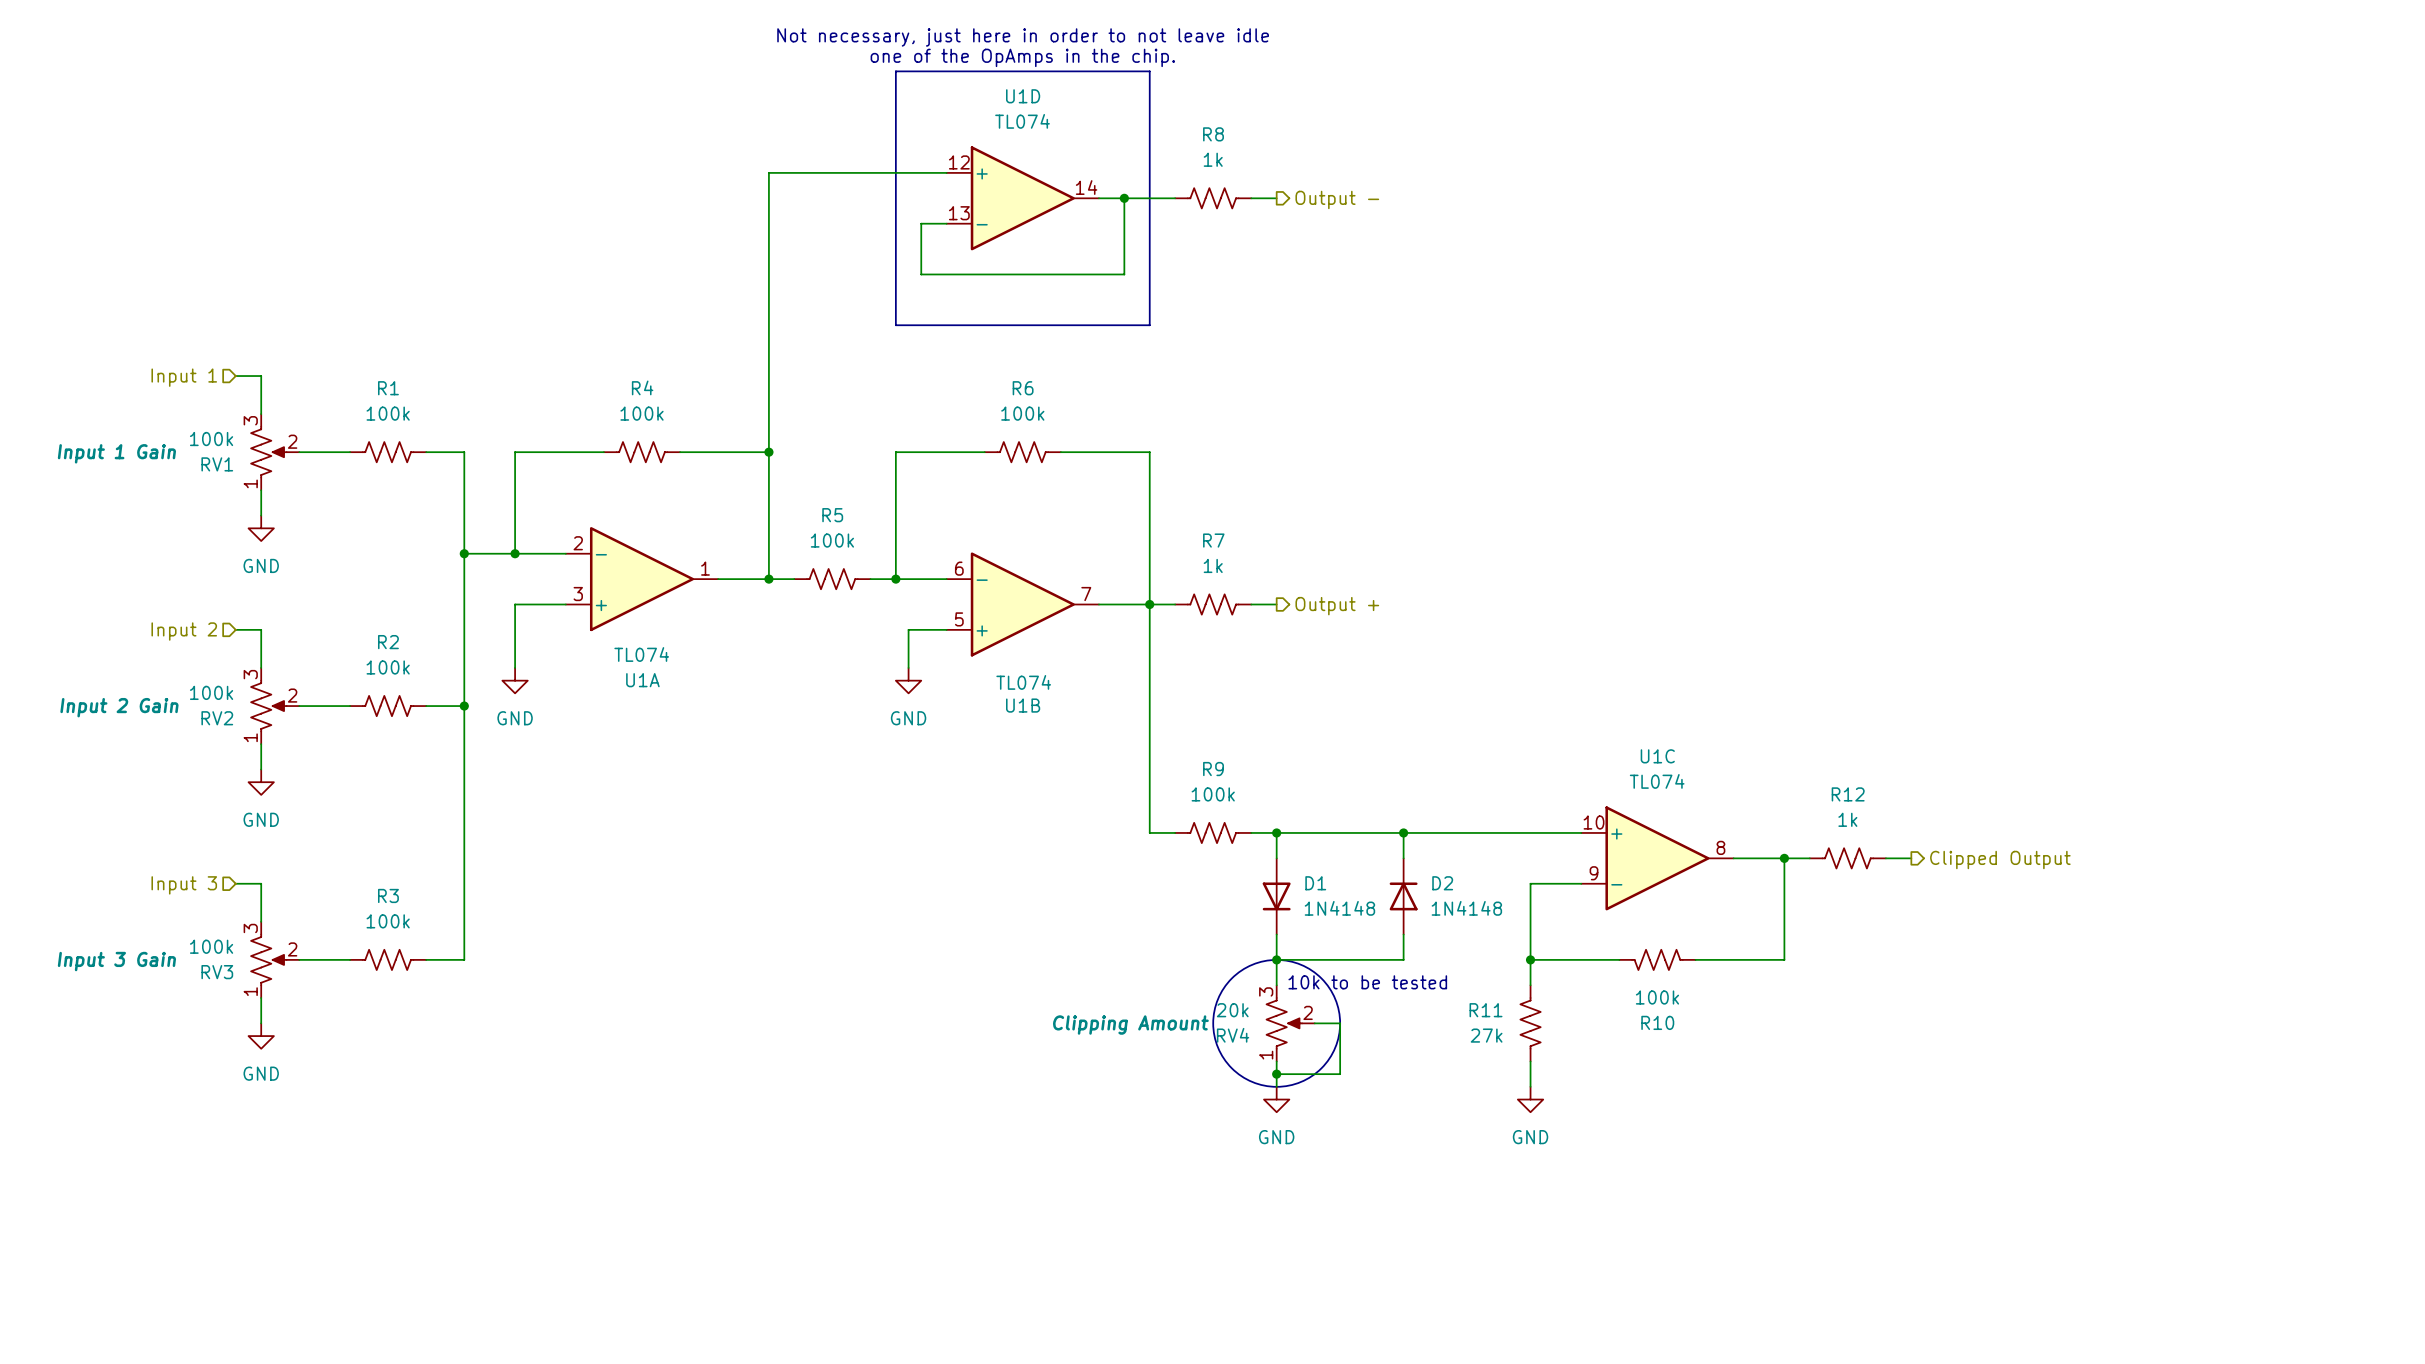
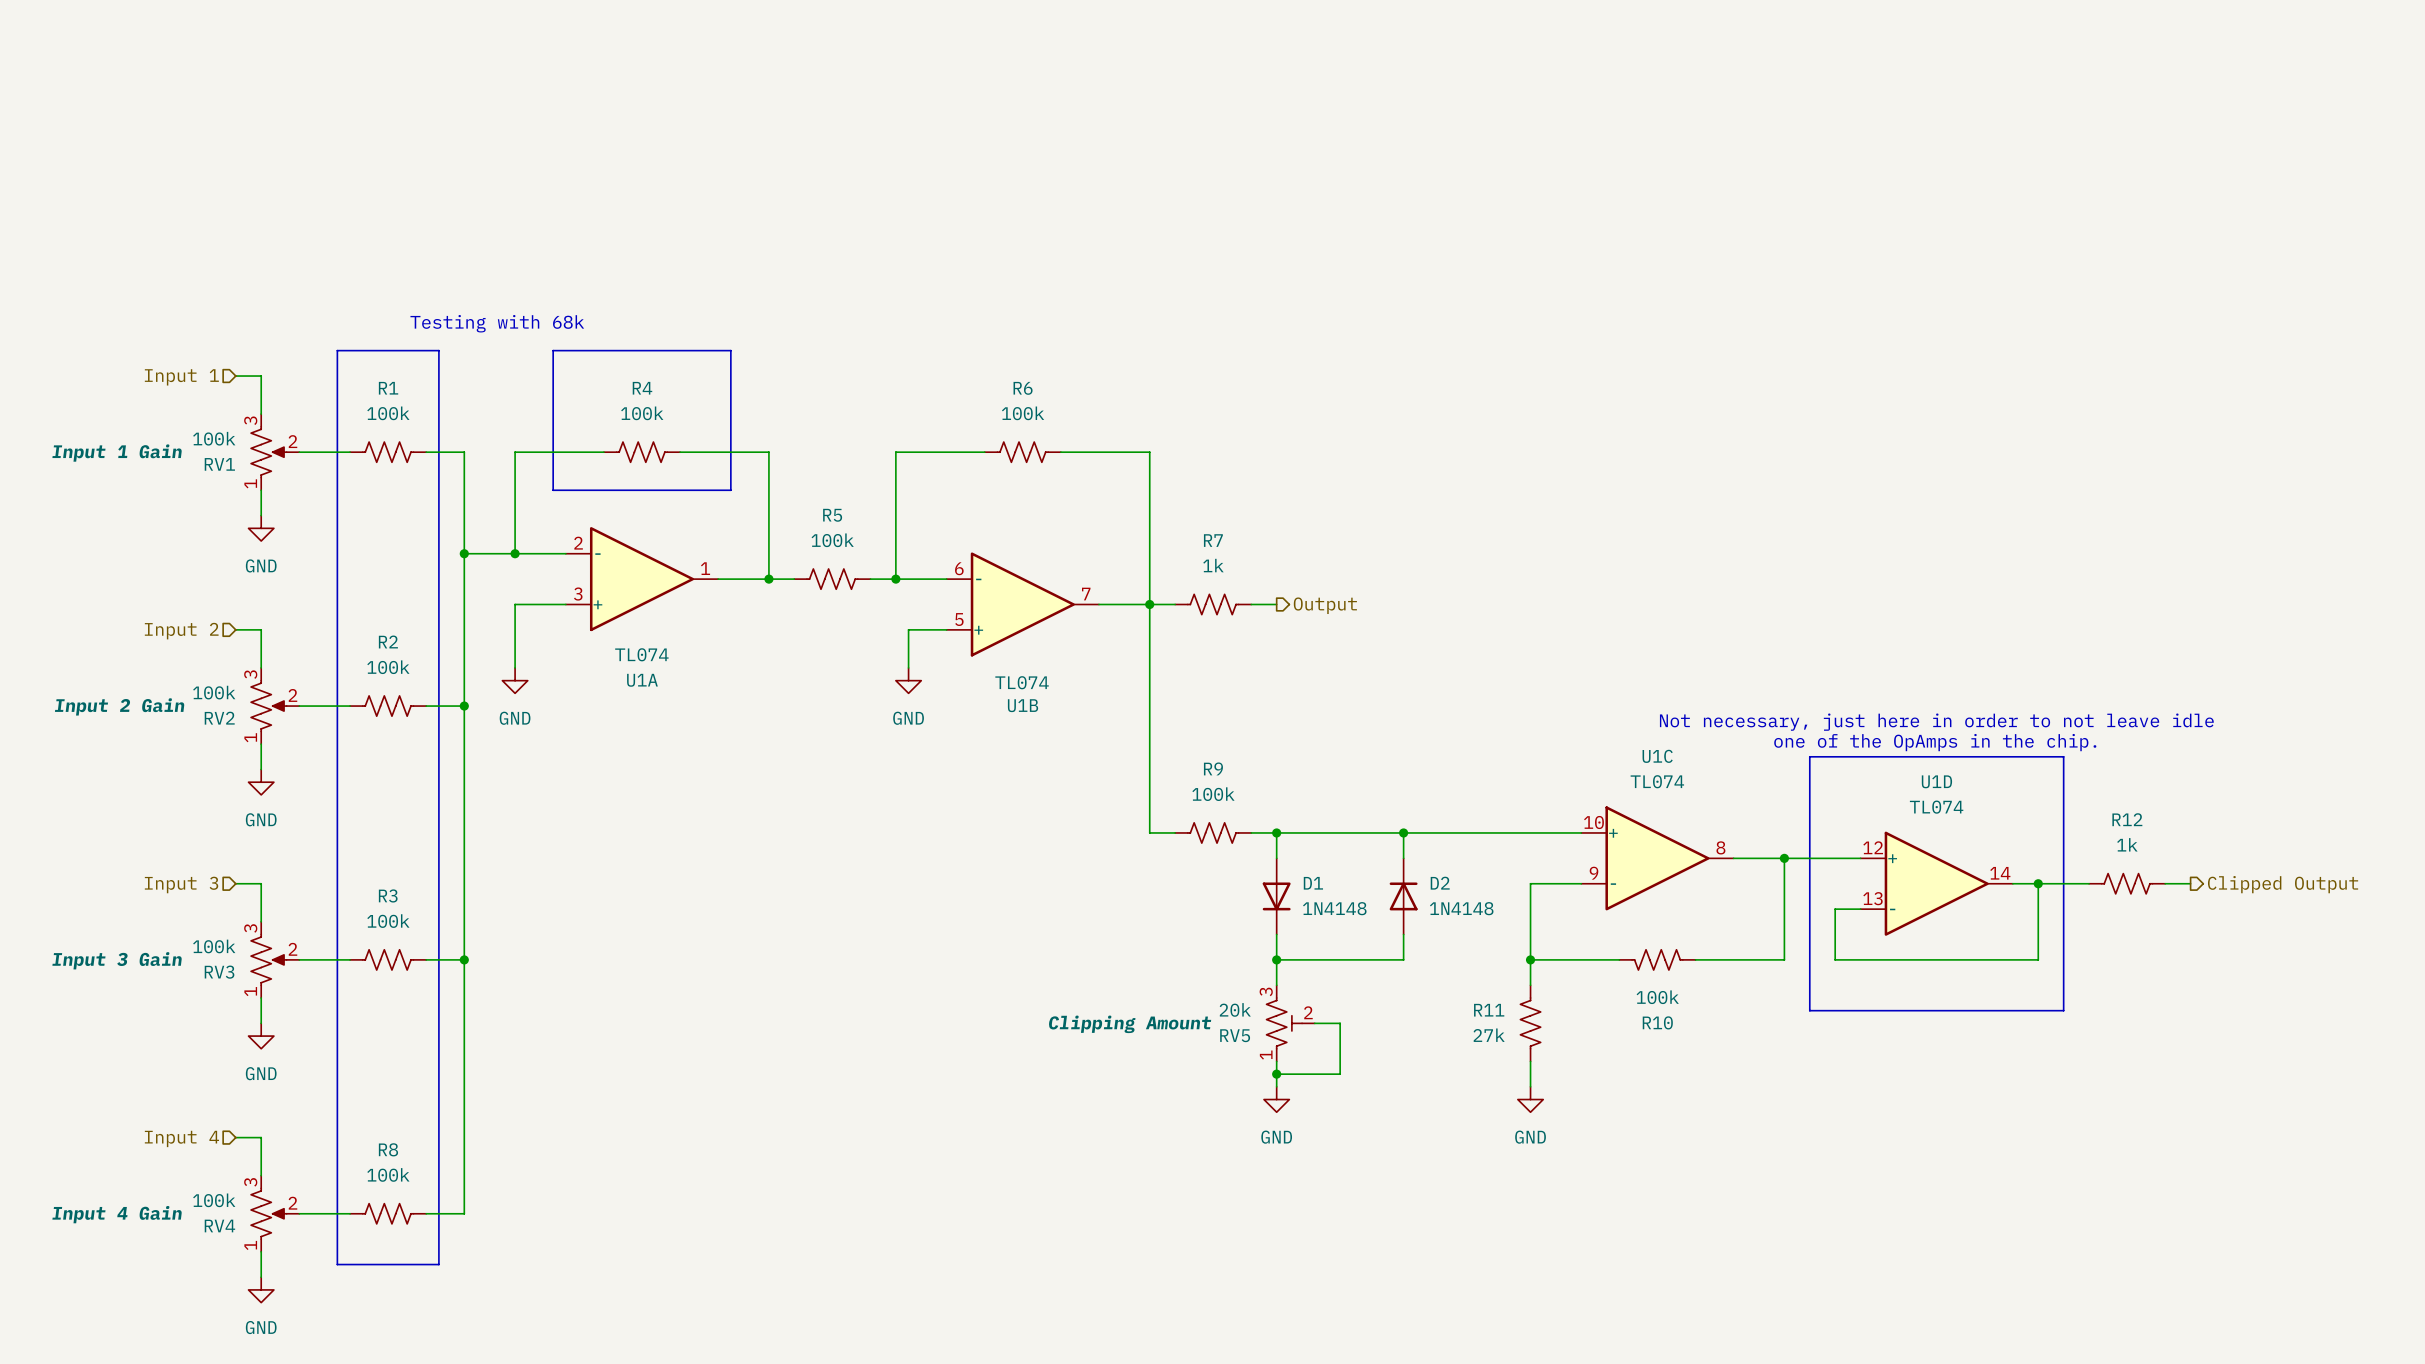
text: Not necessary, just here in order to not leave idle (1023, 37) -> none
text: one of the OpAmps in the chip. (1022, 57) -> none
line: (895, 71) (1149, 71) (1149, 325) (895, 325) (895, 71) -> none
R8 value: 1k (1213, 159) -> 100k (388, 1174)
wire: (946, 172) (768, 172) (768, 452) -> none
U1D position: (1022, 198) -> (1936, 883)
wire: (1098, 198) (1175, 198) -> none
wire: (1124, 198) (1124, 274) (921, 274) (921, 223) (946, 223) -> none
junction: (1124, 198) -> none
R8 position: (1213, 198) -> (388, 1213)
wire: (1251, 198) (1276, 198) -> none
hierarchical label: Output - (1337, 199) -> none
text: none -> Testing with 68k (497, 323)
line: none -> (337, 350) (438, 350) (438, 1264) (337, 1264) (337, 350)
line: none -> (553, 350) (730, 350) (730, 490) (553, 490) (553, 350)
junction: (768, 452) -> none
hierarchical label: Output + (1337, 606) -> Output (1325, 605)
text: none -> Not necessary, just here in order to not leave idle (1936, 722)
text: none -> one of the OpAmps in the chip. (1935, 742)
line: none -> (1809, 756) (2063, 756) (2063, 1010) (1809, 1010) (1809, 756)
wire: none -> (1809, 858) (1860, 858)
R12 position: (1847, 858) -> (2127, 883)
hierarchical label: Clipped Output (2000, 860) -> none
wire: none -> (2012, 883) (2089, 883)
wire: none -> (2038, 883) (2038, 959) (1835, 959) (1835, 909) (1860, 909)
junction: none -> (2038, 883)
wire: none -> (2165, 883) (2190, 883)
hierarchical label: none -> Clipped Output (2283, 884)
wire: none -> (464, 959) (464, 1213) (426, 1213)
junction: none -> (464, 959)
drawing: [1213, 959, 1341, 1087] -> none
text: 10k to be tested (1367, 982) -> none
RV4 value: 20k (1232, 1010) -> 100k (214, 1200)
RV4 position: (1290, 1023) -> (275, 1213)
RV5: none -> 20k (1290, 1023)
RV4 text: Clipping Amount (1130, 1025) -> Input 4 Gain (117, 1214)
wire: none -> (235, 1137) (261, 1137) (261, 1175)
hierarchical label: none -> Input 4 (181, 1138)
wire: none -> (299, 1213) (350, 1213)
wire: none -> (261, 1251) (261, 1277)
power symbol: none -> GND (261, 1289)

